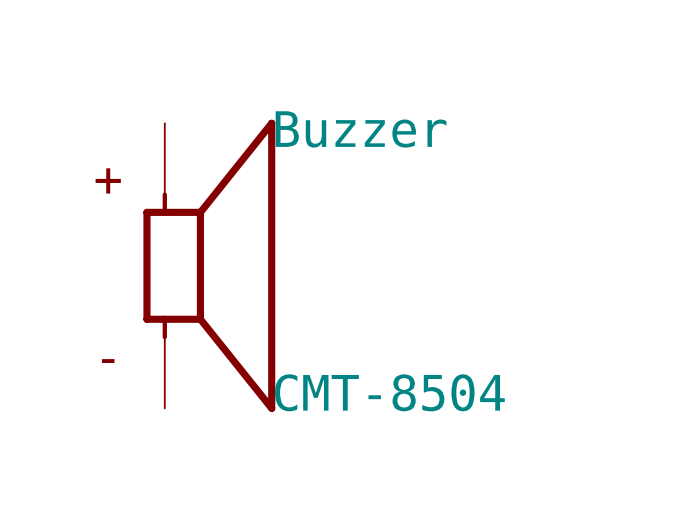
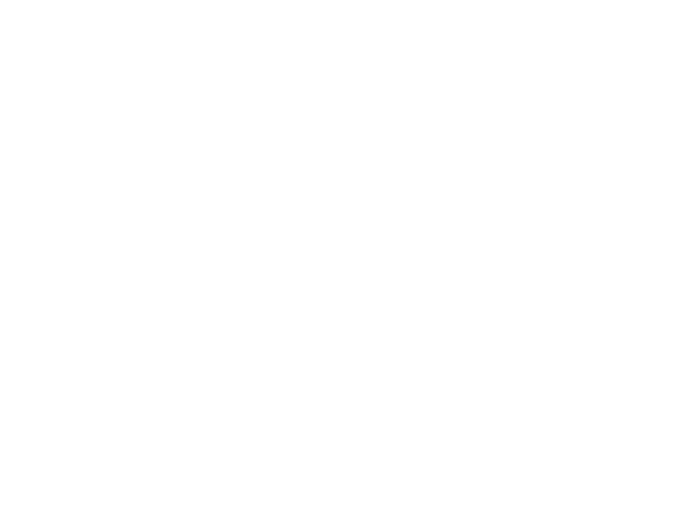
Buzzer: CMT-8504 (209, 265) -> none

